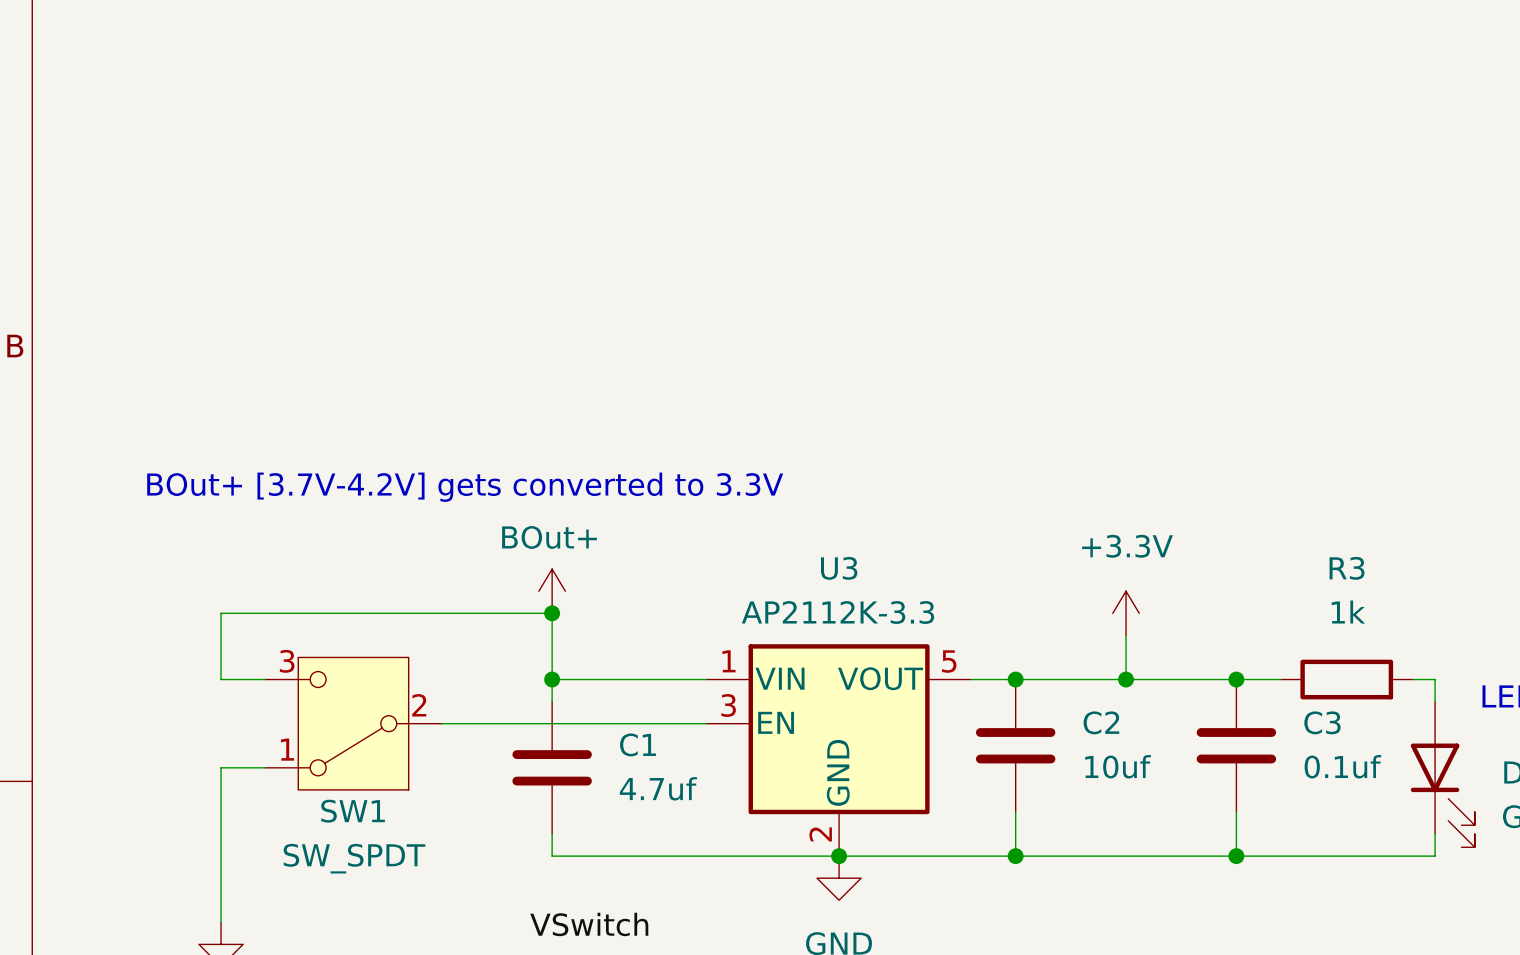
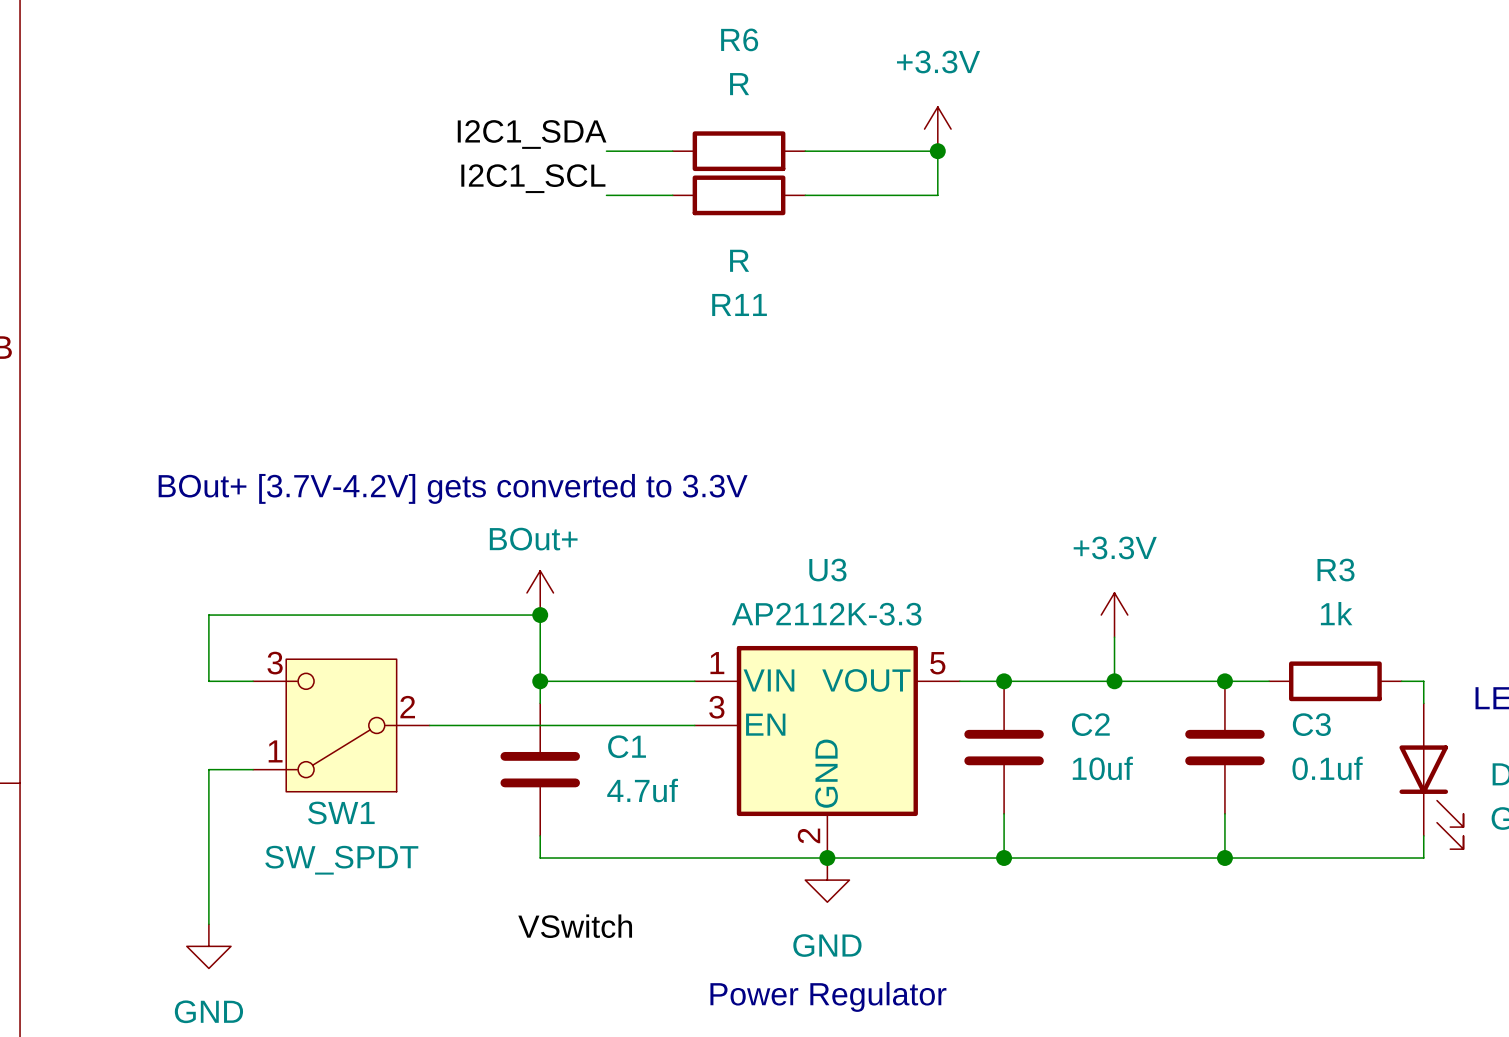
power symbol: none -> +3.3V (937, 129)
label: none -> I2C1_SDA (532, 134)
wire: none -> (606, 151) (672, 151)
R6: none -> R (739, 151)
wire: none -> (805, 151) (937, 151) (937, 195) (805, 195)
junction: none -> (937, 151)
label: none -> I2C1_SCL (533, 178)
wire: none -> (606, 195) (672, 195)
R11: none -> R (739, 195)

